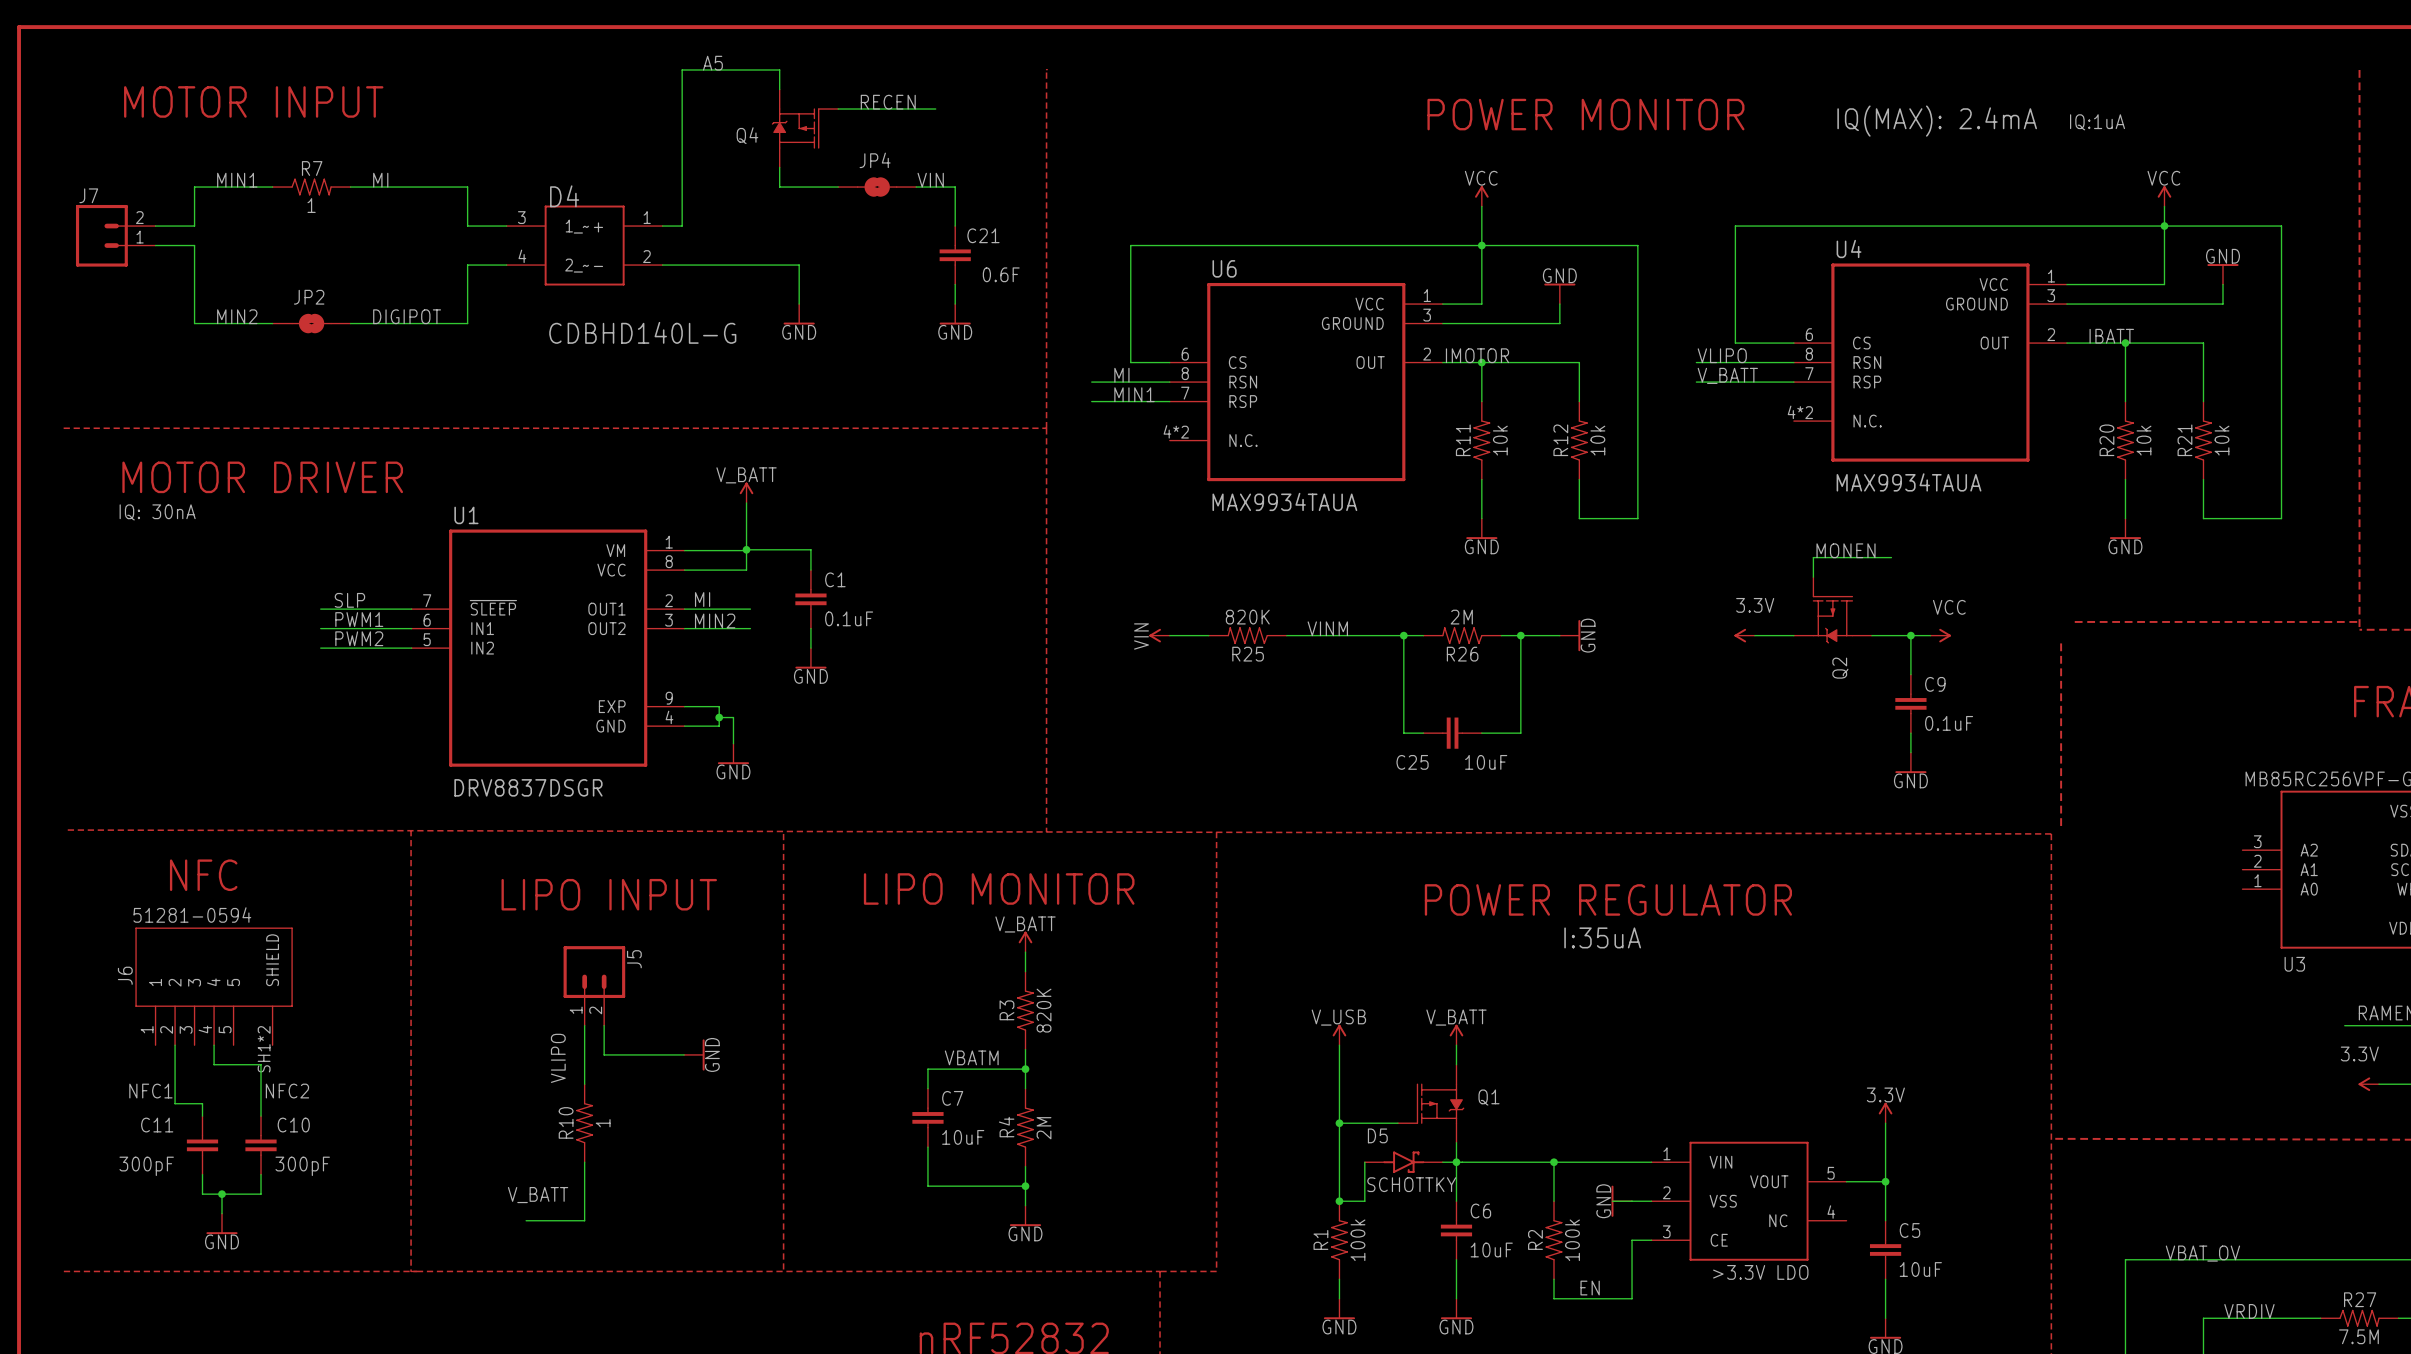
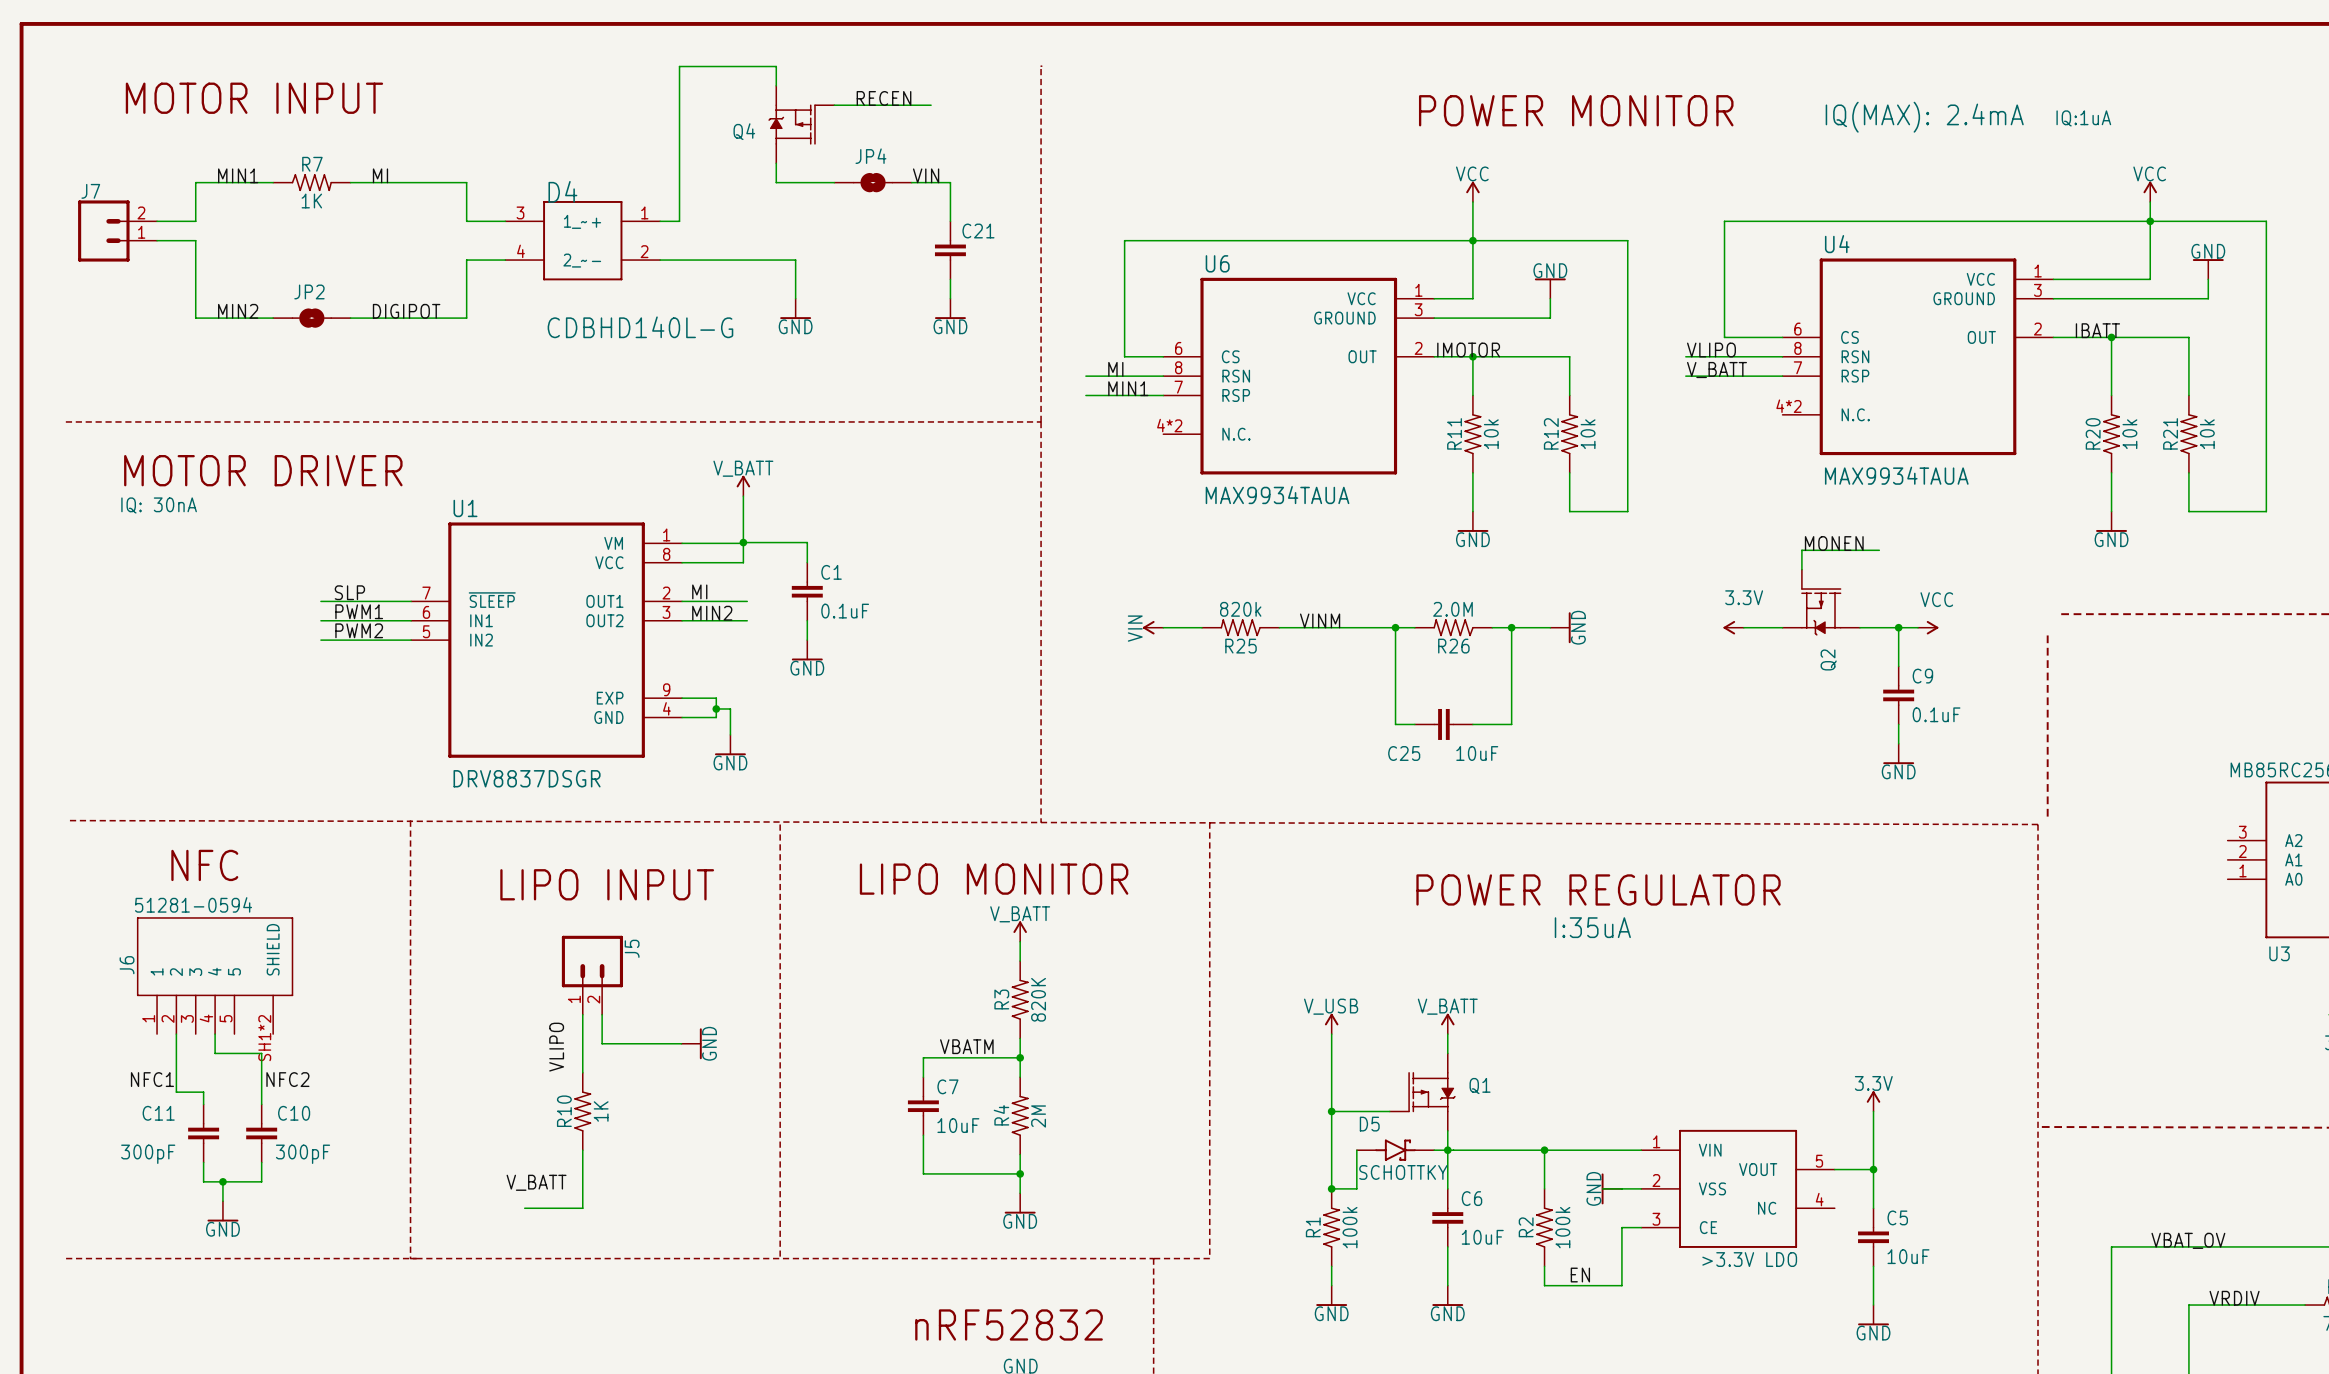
label: A5 (712, 63) -> none
R7 value: 1 (311, 205) -> 1K (311, 201)
C21 value: 0.6F (1001, 274) -> none
R25 value: 820K (1247, 617) -> 820k (1240, 609)
R26 value: 2M (1461, 617) -> 2.0M (1453, 609)
R10 value: 1 (603, 1123) -> 1K (601, 1111)

